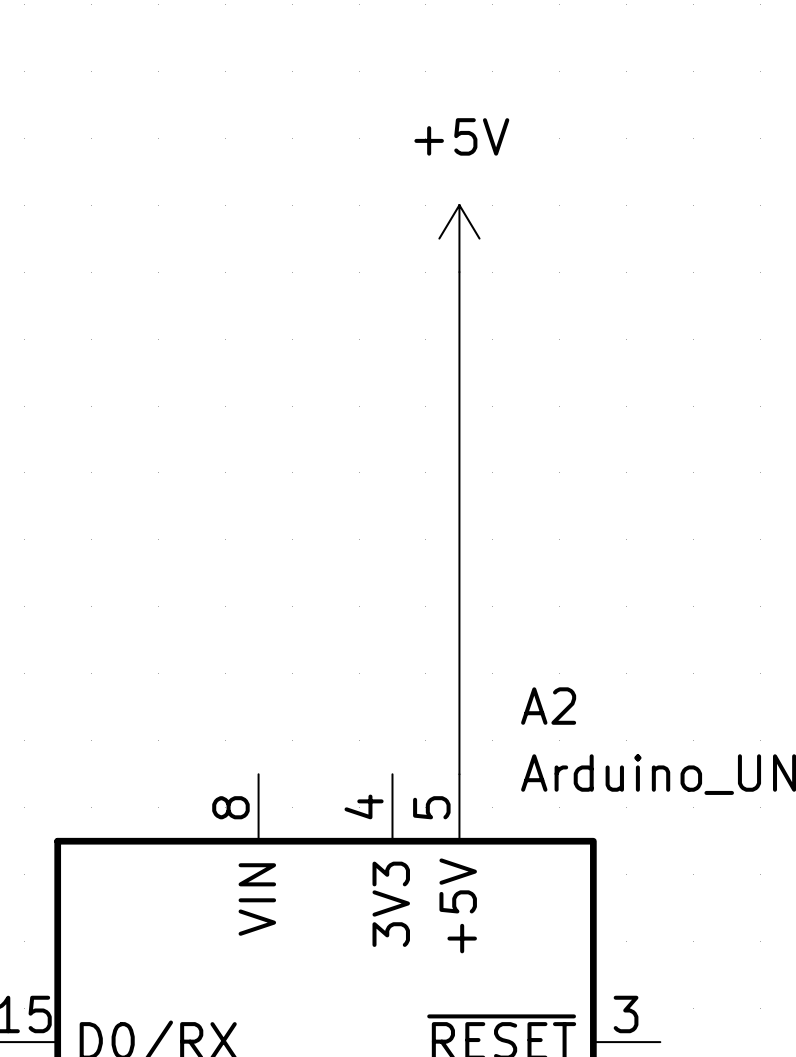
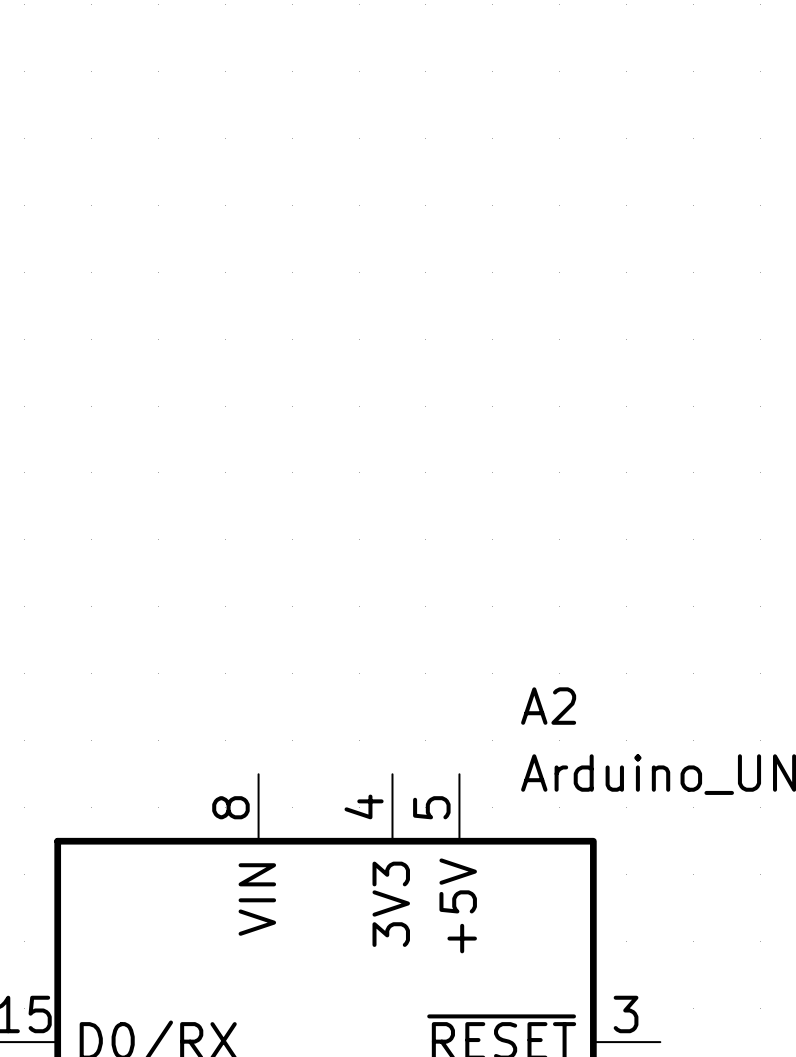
power symbol: +5V (459, 238) -> none
wire: (459, 272) (459, 774) -> none

